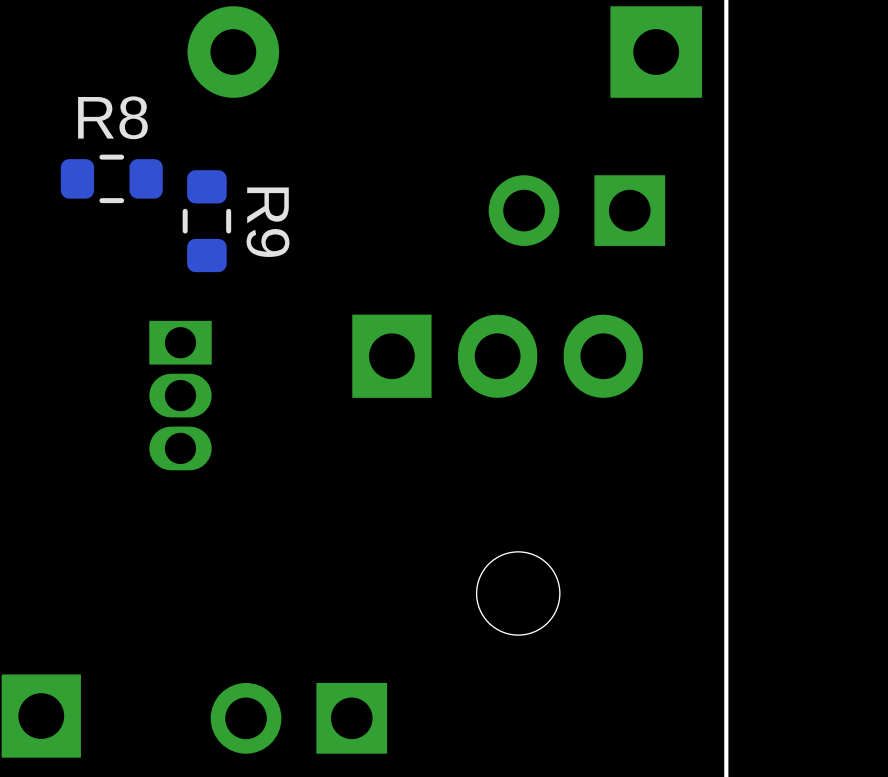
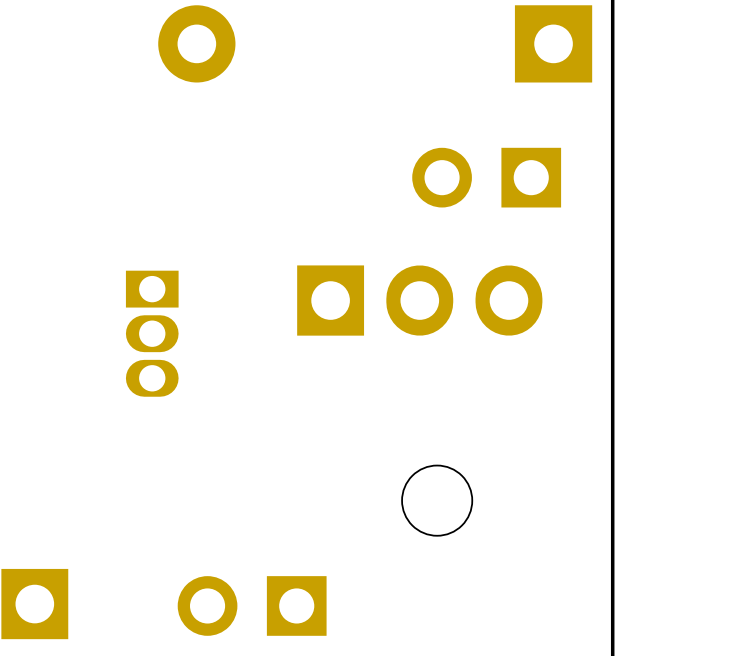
R8: (111, 178) -> none
R9: (206, 221) -> none

